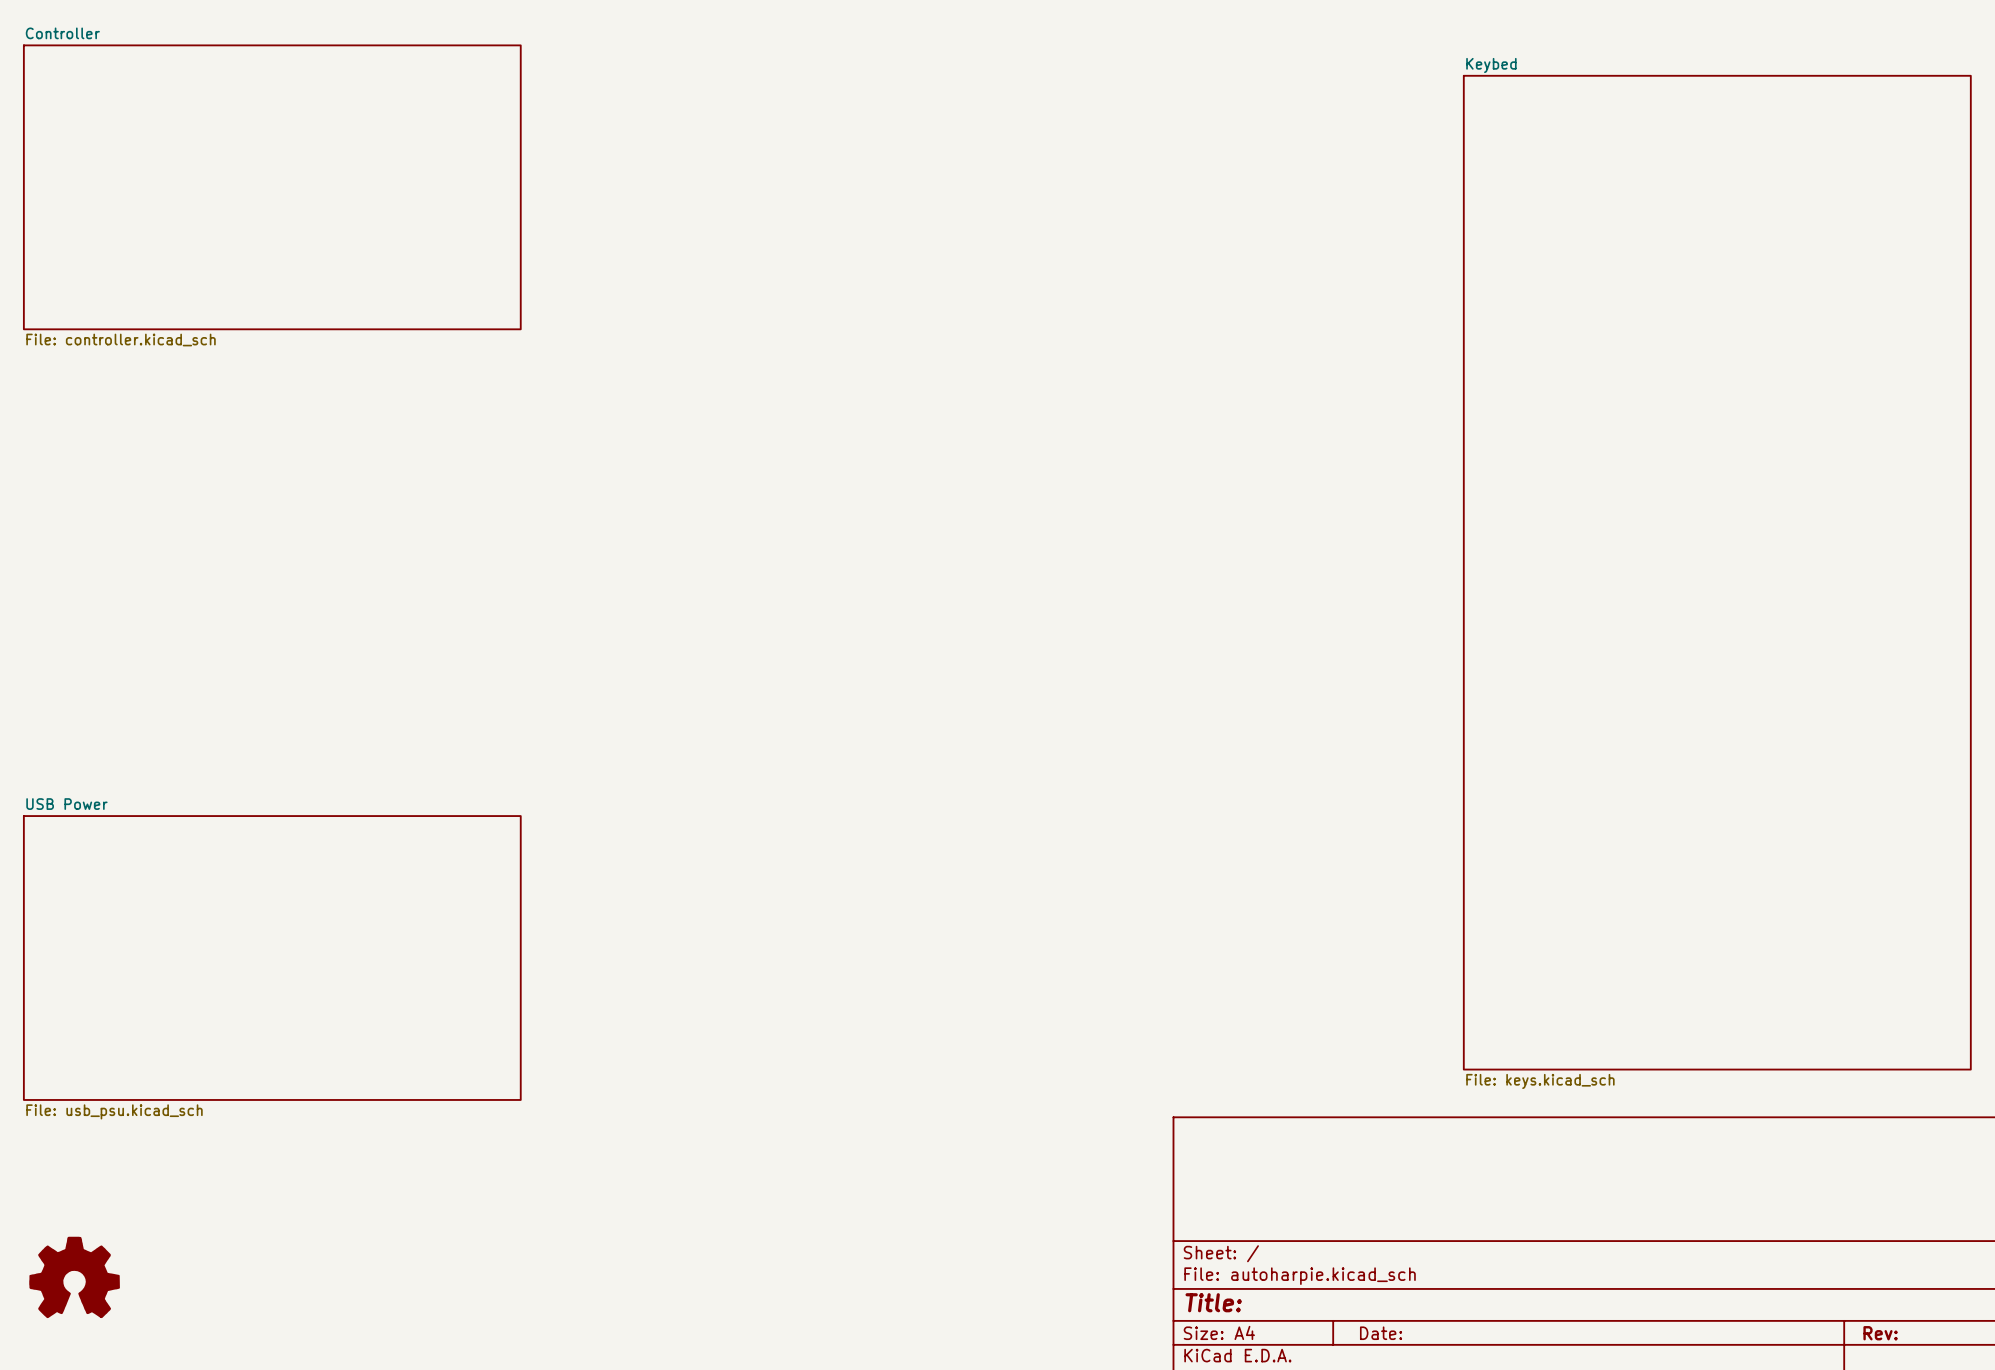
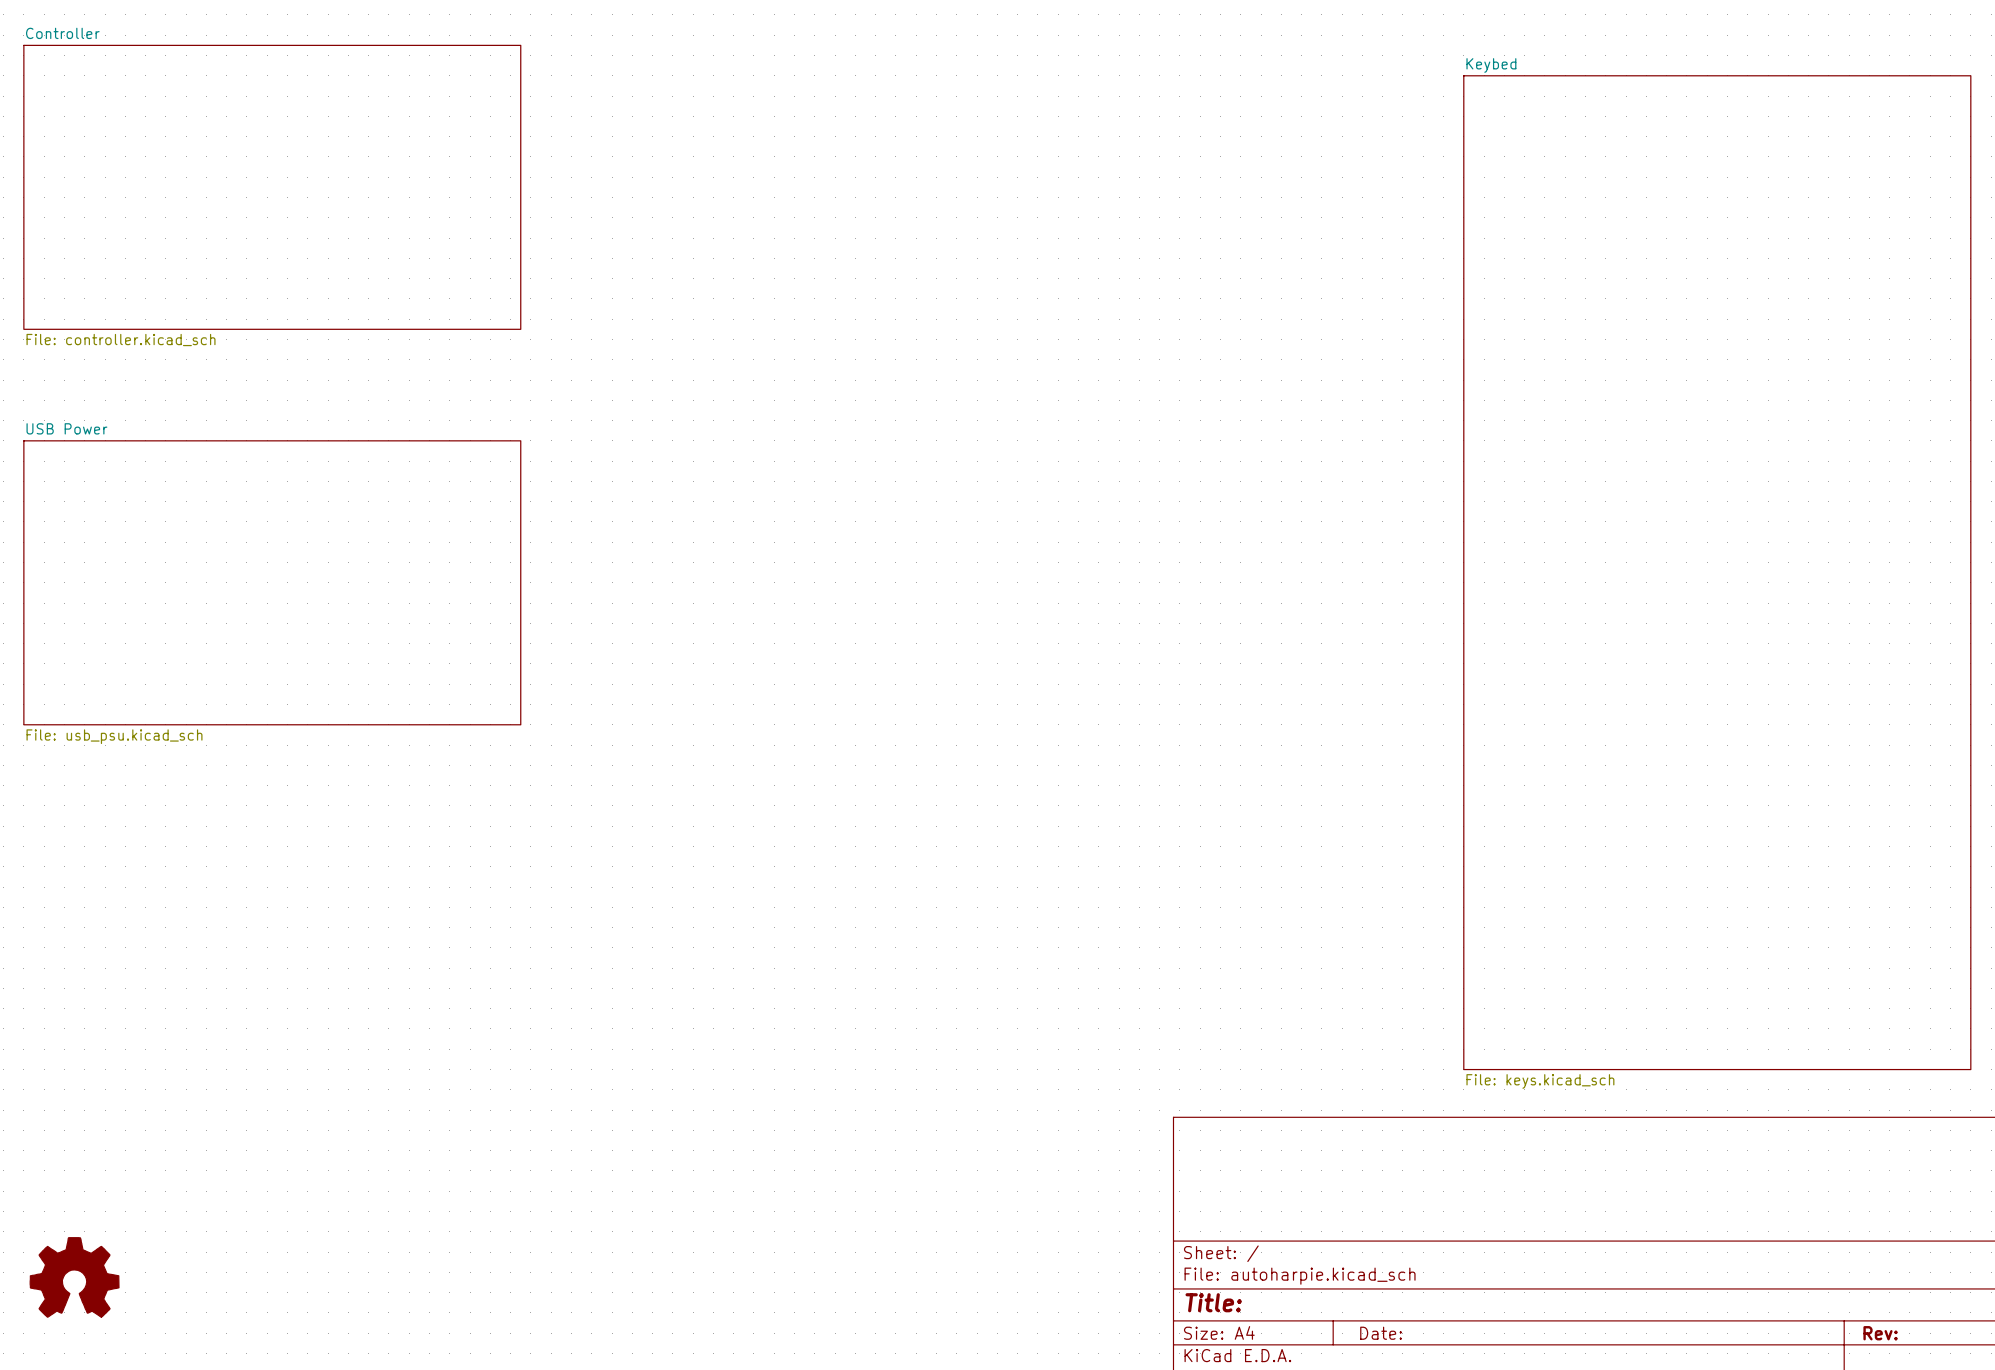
sheet USB Power: none -> File: usb_psu.kicad_sch (272, 582)
sheet USB Power: File: usb_psu.kicad_sch (272, 958) -> none

